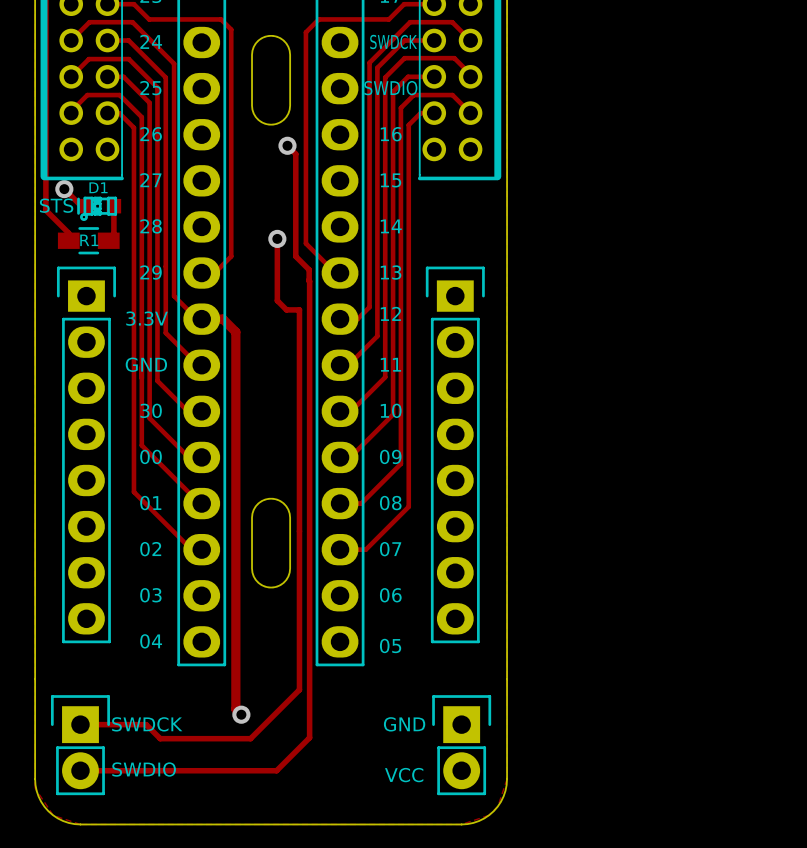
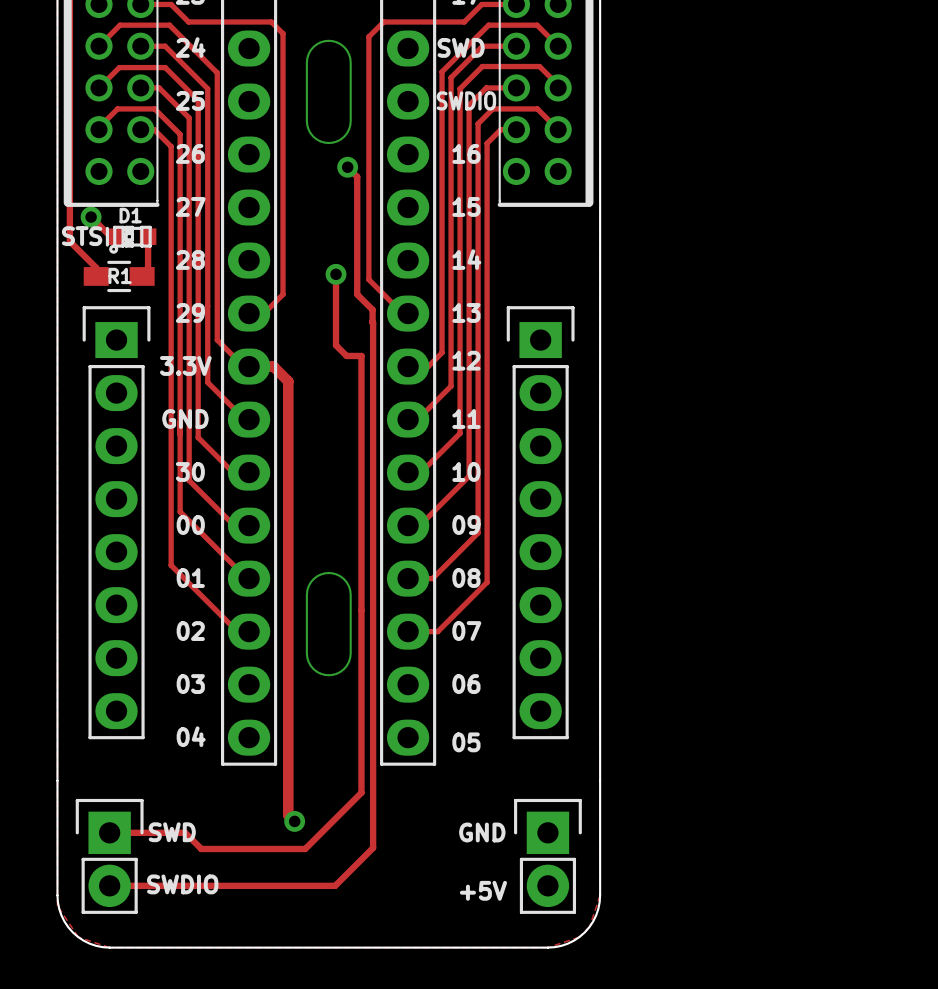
text: SWDCK (393, 42) -> SWD (461, 47)
text: SWDCK (147, 724) -> SWD (172, 832)
text: VCC (404, 775) -> +5V (483, 890)

